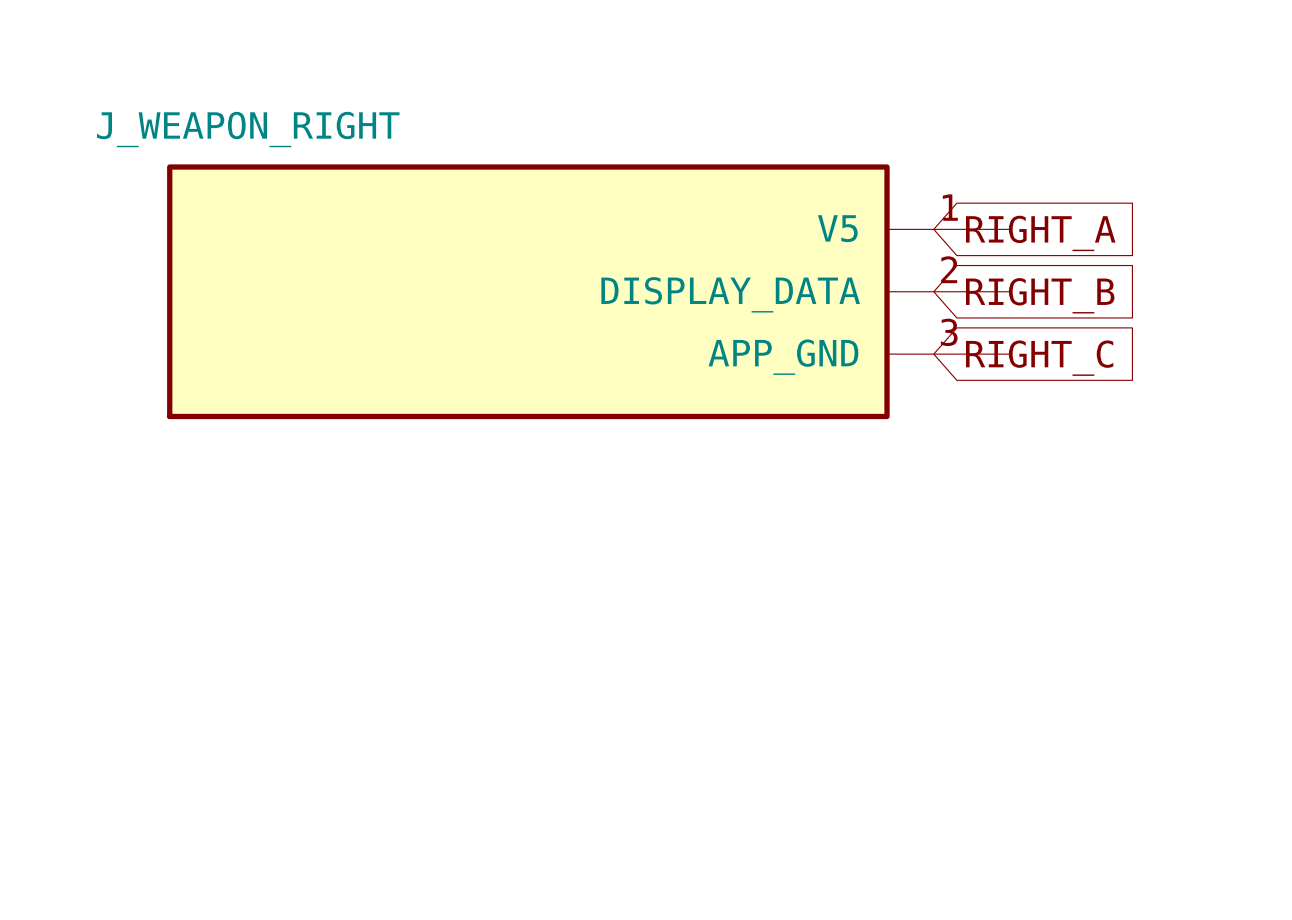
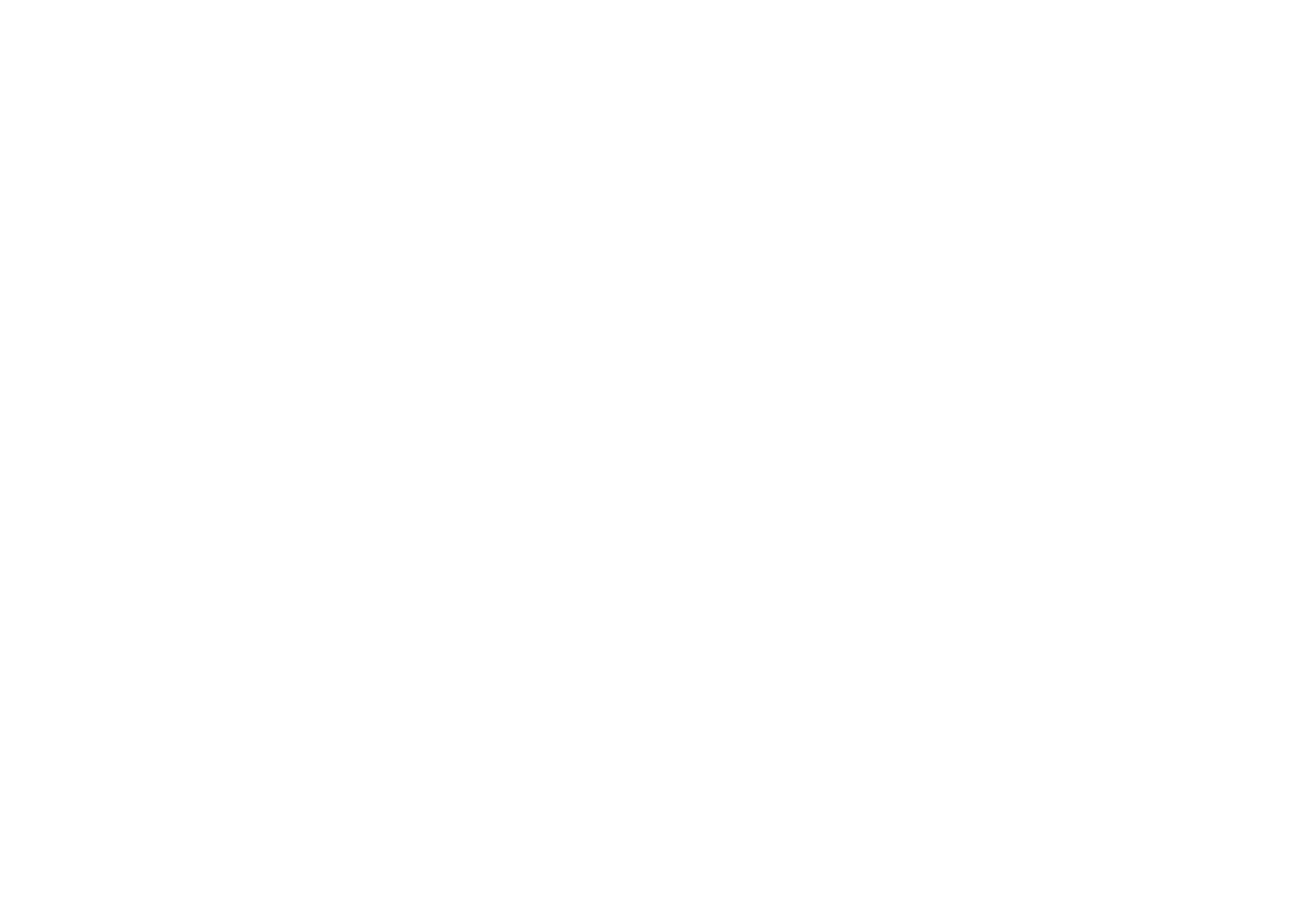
global label: RIGHT_A (1040, 233) -> none
J_WEAPON_RIGHT: (589, 291) -> none
global label: RIGHT_B (1040, 295) -> none
global label: RIGHT_C (1039, 358) -> none

